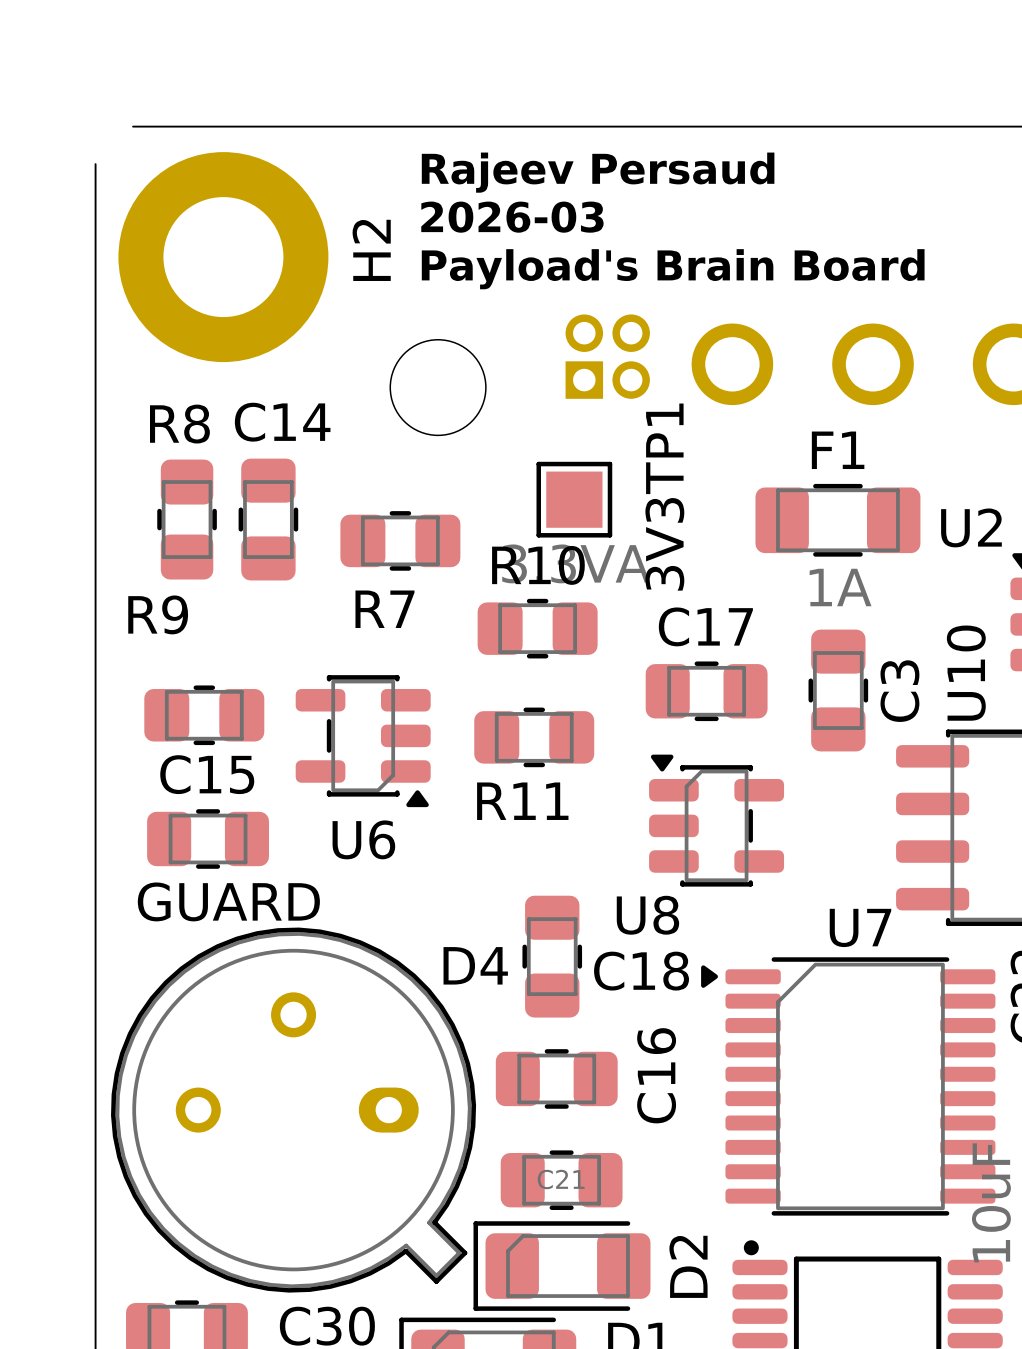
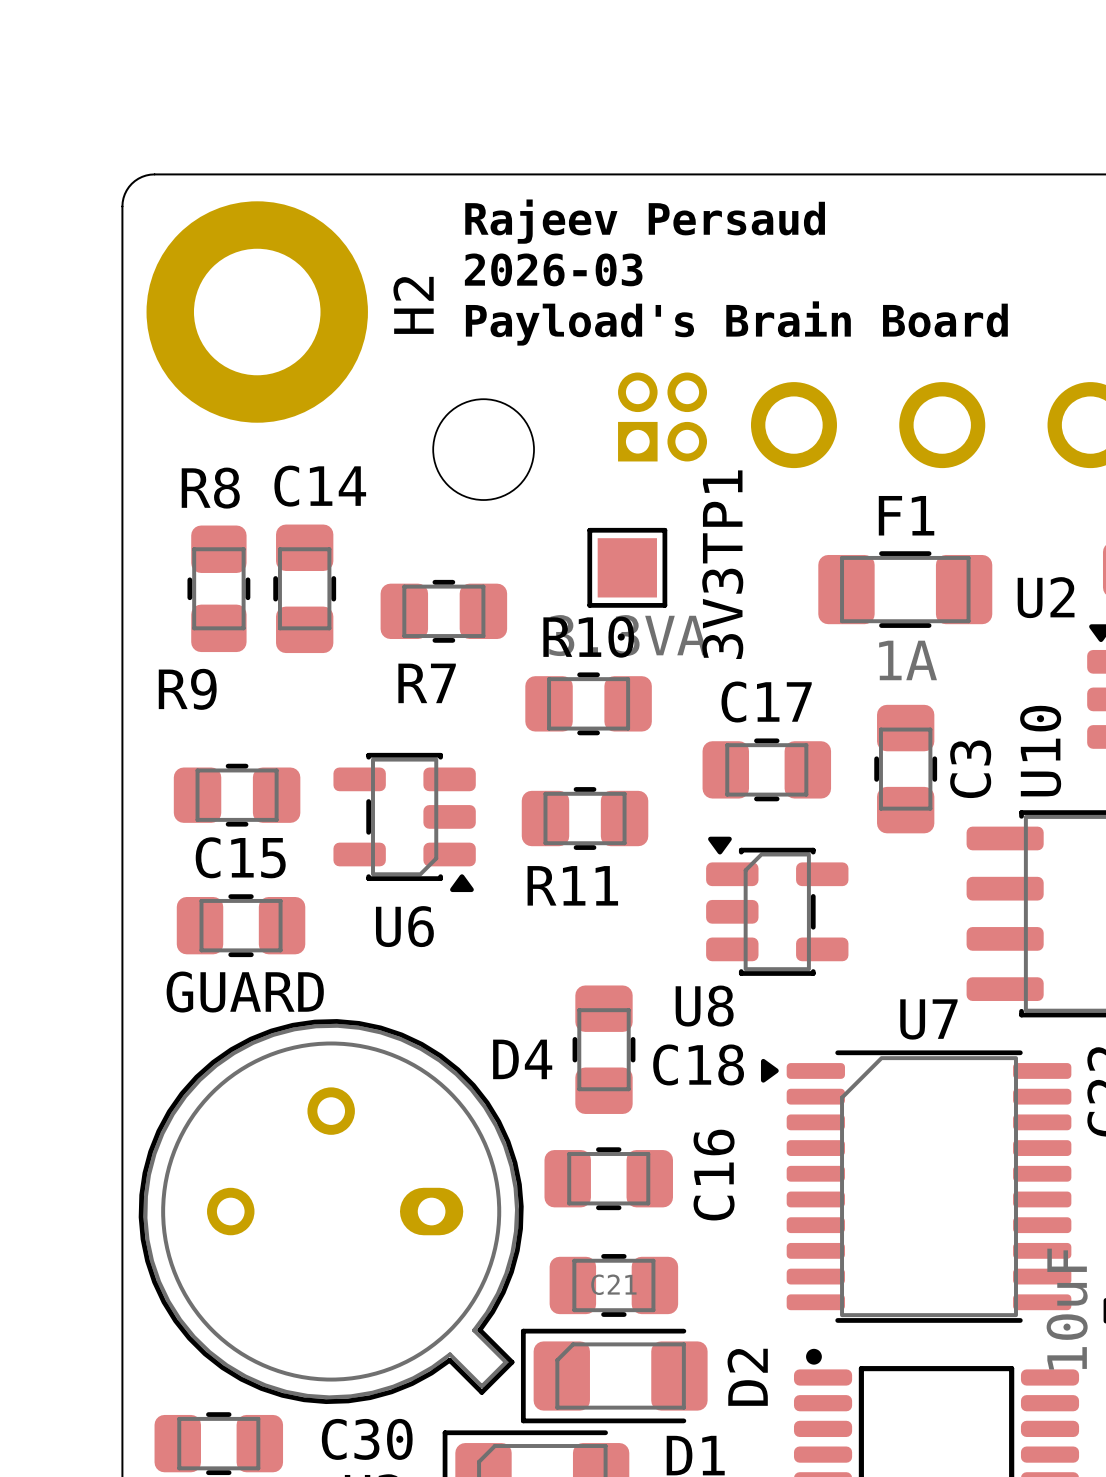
board edge: none -> (154, 174) (142, 176) (129, 186) (123, 198) (122, 213)
board edge: none -> (154, 174) (161, 174)

